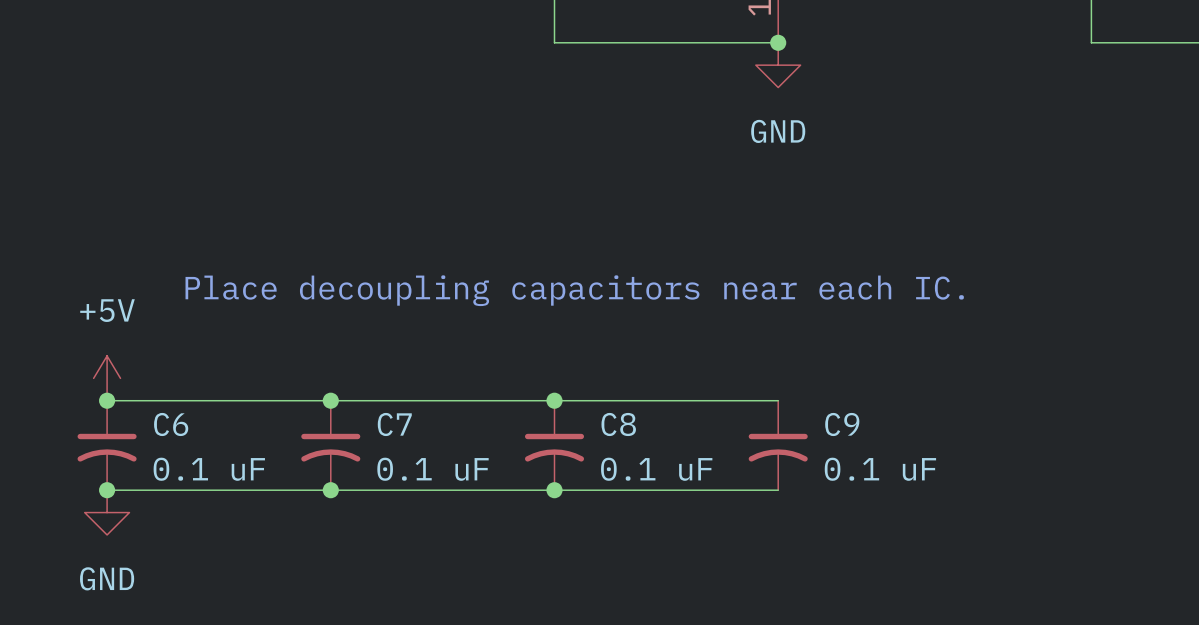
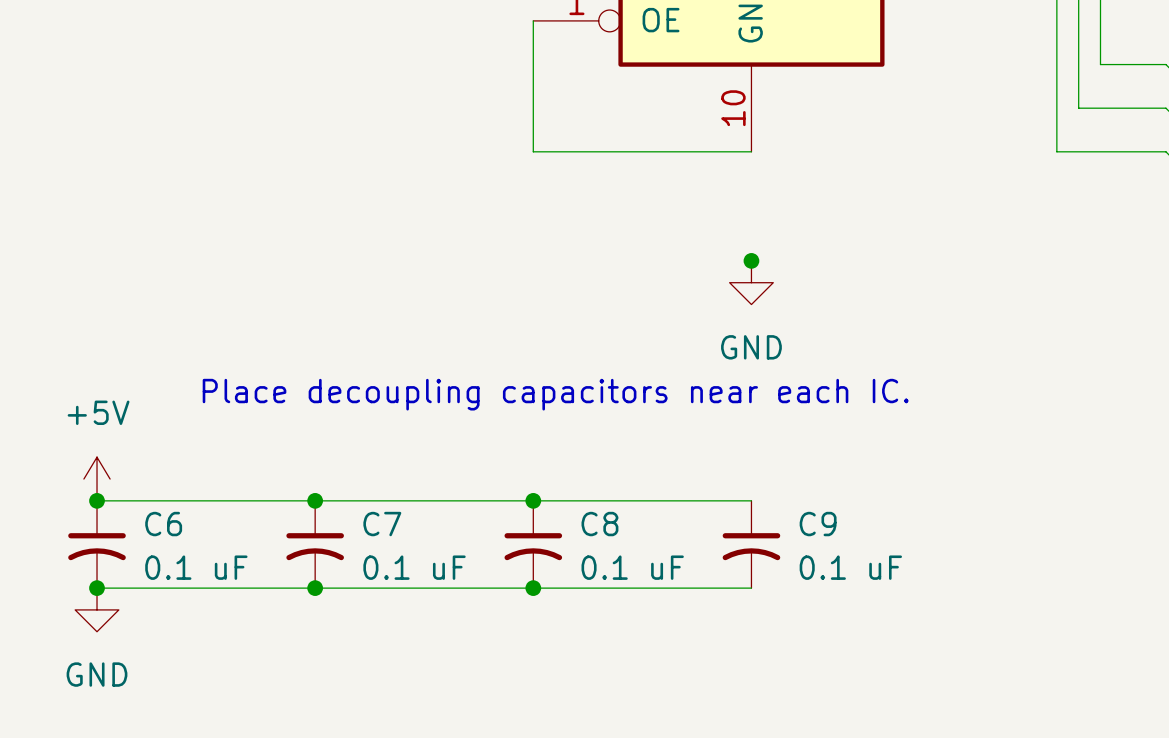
junction: (778, 42) -> none
power symbol position: GND (778, 65) -> GND (751, 282)
junction: none -> (751, 260)

